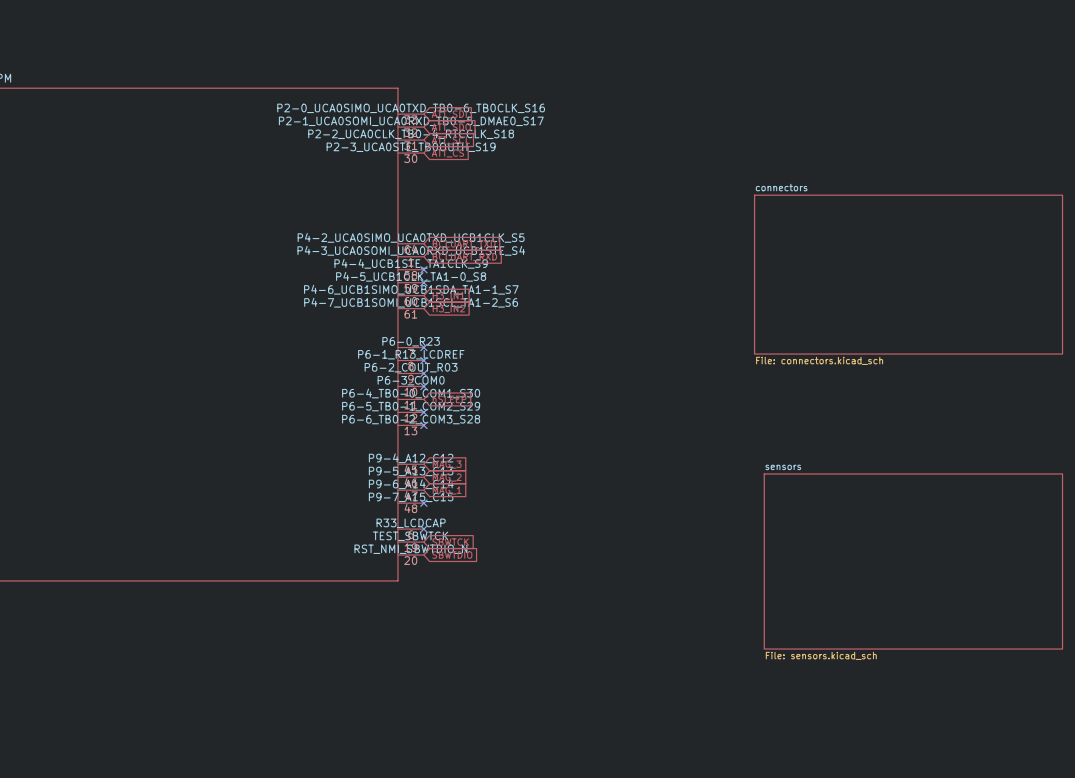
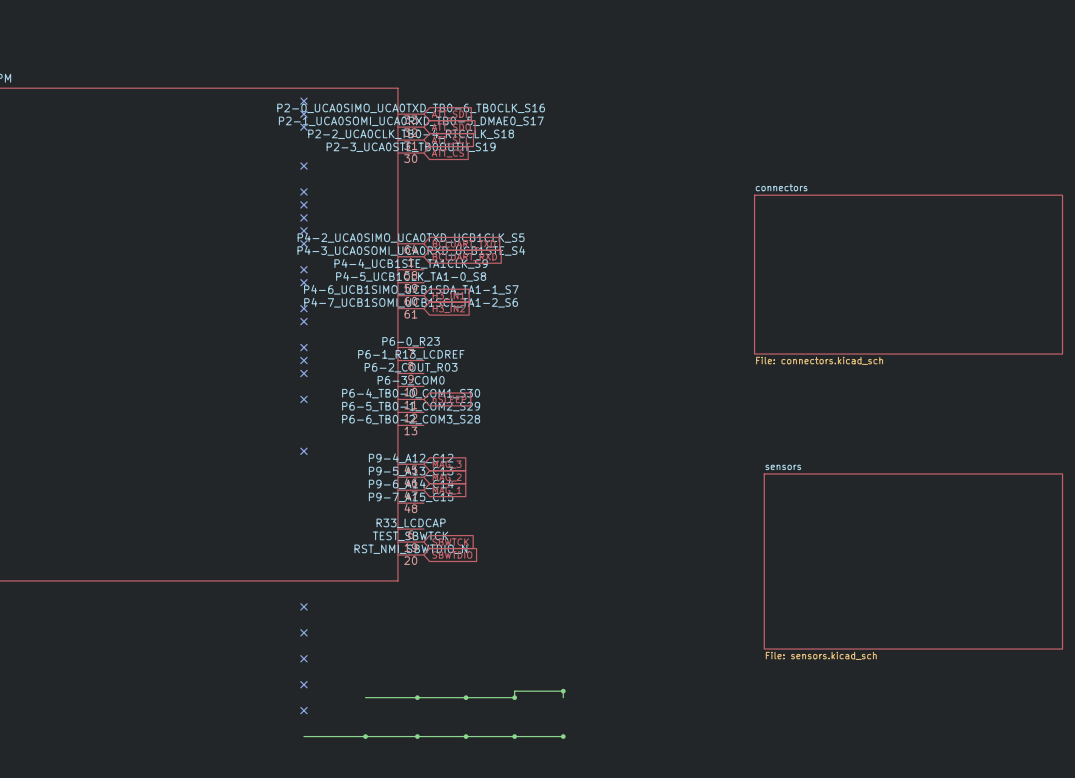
no-connect mark: none -> (303, 101)
no-connect mark: none -> (303, 114)
no-connect mark: none -> (303, 127)
no-connect mark: none -> (303, 166)
no-connect mark: none -> (303, 191)
no-connect mark: none -> (303, 204)
no-connect mark: none -> (303, 217)
no-connect mark: none -> (303, 230)
no-connect mark: none -> (303, 243)
no-connect mark: none -> (303, 269)
no-connect mark: (423, 269) -> none
no-connect mark: none -> (303, 282)
no-connect mark: (423, 282) -> none
no-connect mark: none -> (303, 308)
no-connect mark: none -> (303, 321)
no-connect mark: none -> (303, 347)
no-connect mark: (423, 347) -> none
no-connect mark: none -> (303, 360)
no-connect mark: (423, 360) -> none
no-connect mark: none -> (303, 373)
no-connect mark: (423, 373) -> none
no-connect mark: (423, 386) -> none
no-connect mark: none -> (303, 399)
no-connect mark: (423, 412) -> none
no-connect mark: (423, 425) -> none
no-connect mark: none -> (303, 451)
no-connect mark: (423, 503) -> none
no-connect mark: (423, 529) -> none
no-connect mark: none -> (303, 606)
no-connect mark: none -> (303, 632)
no-connect mark: none -> (303, 658)
no-connect mark: none -> (303, 684)
junction: none -> (563, 691)
wire: none -> (365, 697) (514, 697) (514, 691) (563, 691) (563, 697)
junction: none -> (417, 697)
junction: none -> (466, 697)
junction: none -> (514, 697)
no-connect mark: none -> (303, 710)
wire: none -> (303, 736) (563, 736)
junction: none -> (365, 736)
junction: none -> (417, 736)
junction: none -> (466, 736)
junction: none -> (514, 736)
junction: none -> (563, 736)

